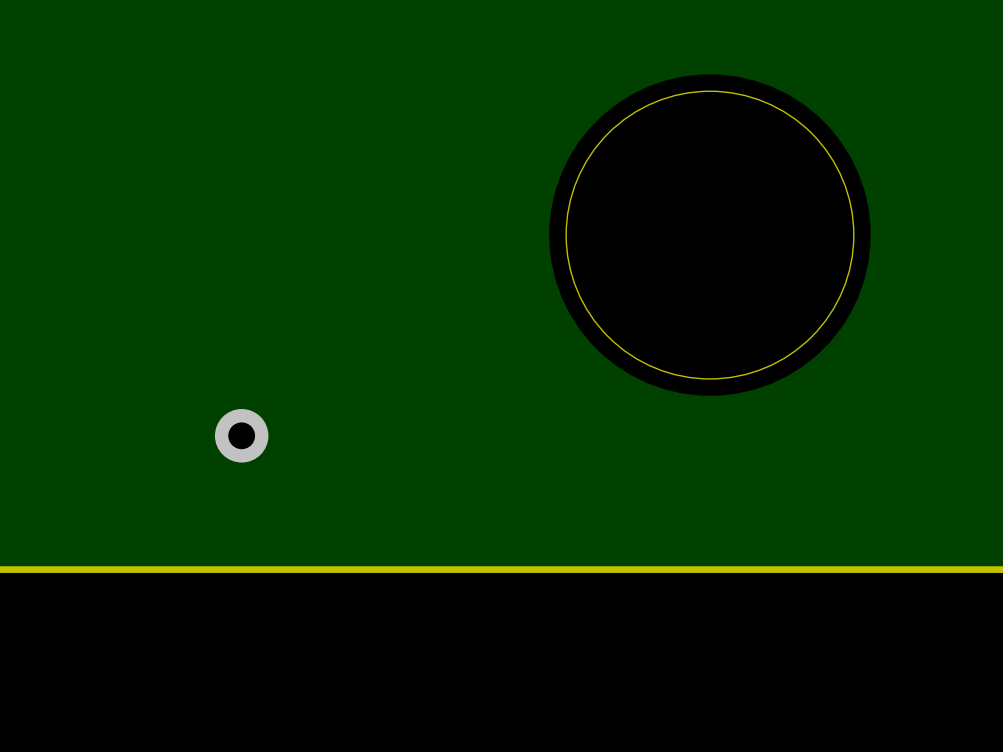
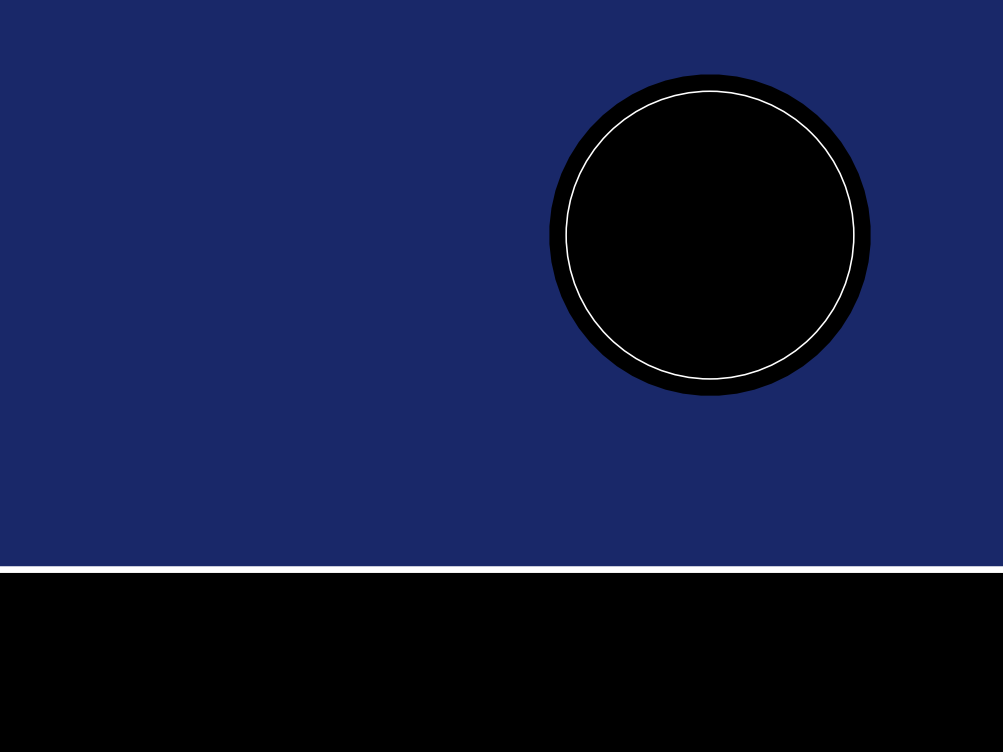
via: (241, 435) -> none

